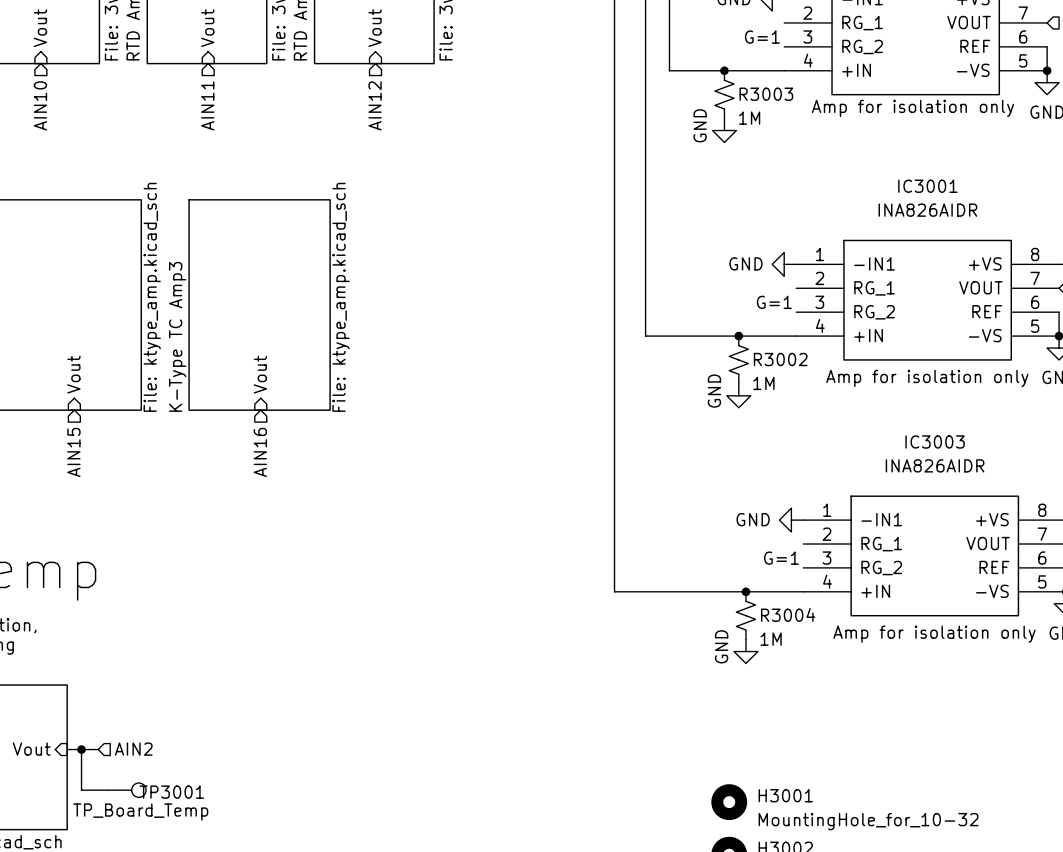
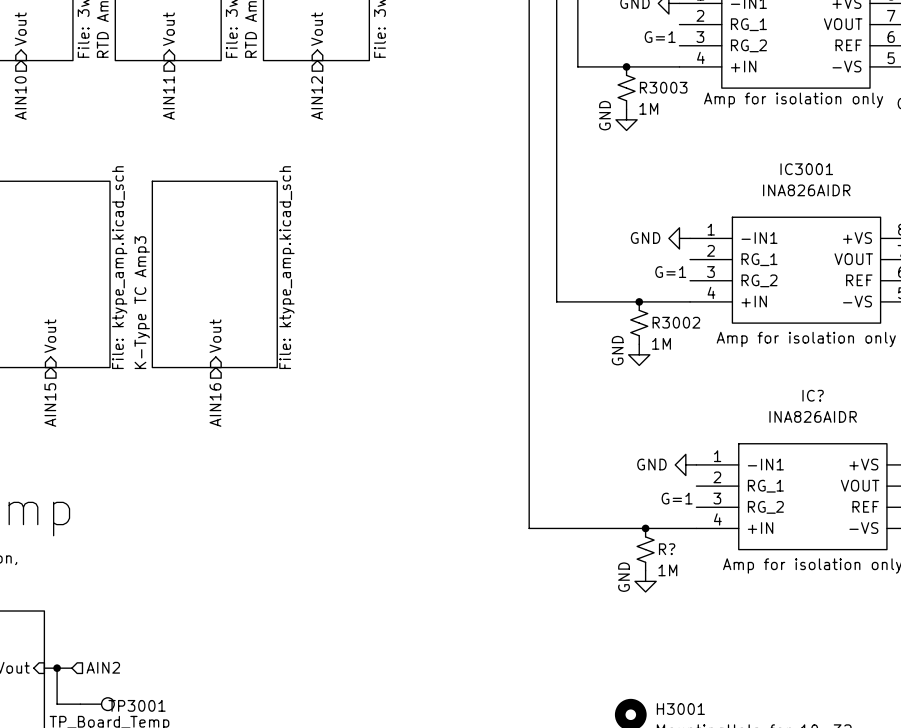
IC3003 name: IC3003 (935, 441) -> IC? (813, 395)
R3004 name: R3004 (788, 614) -> R? (667, 549)

